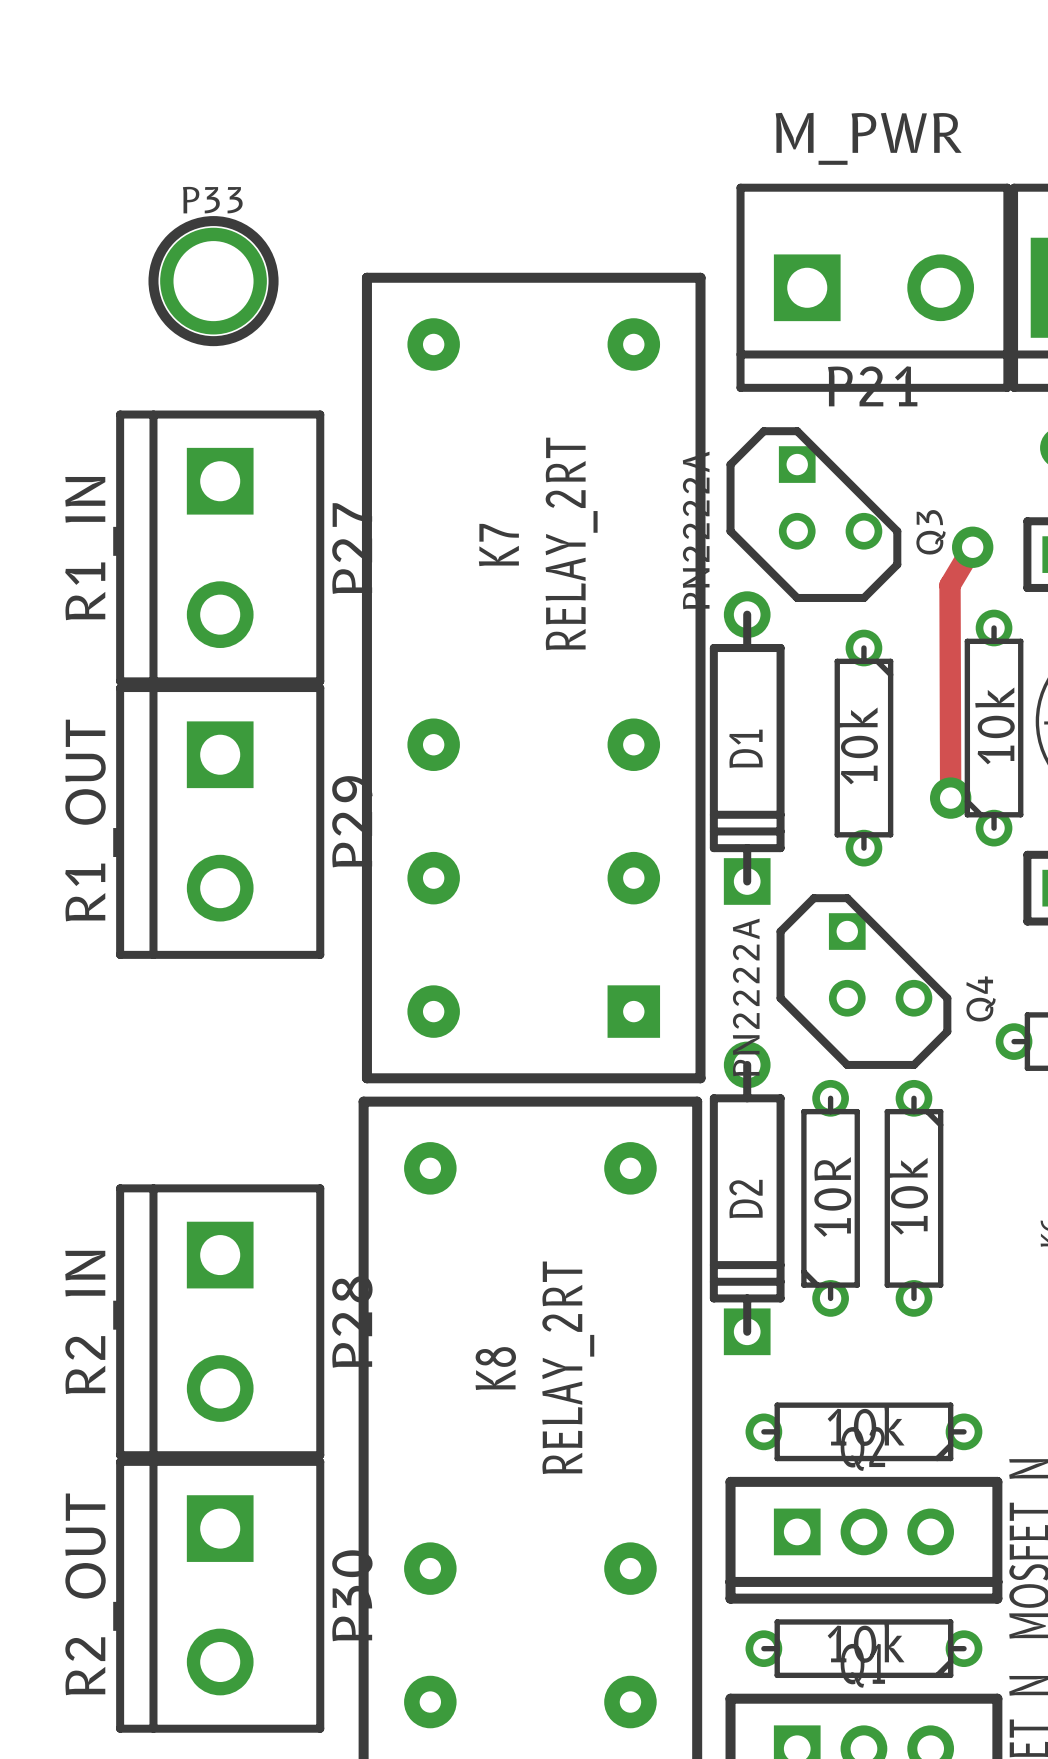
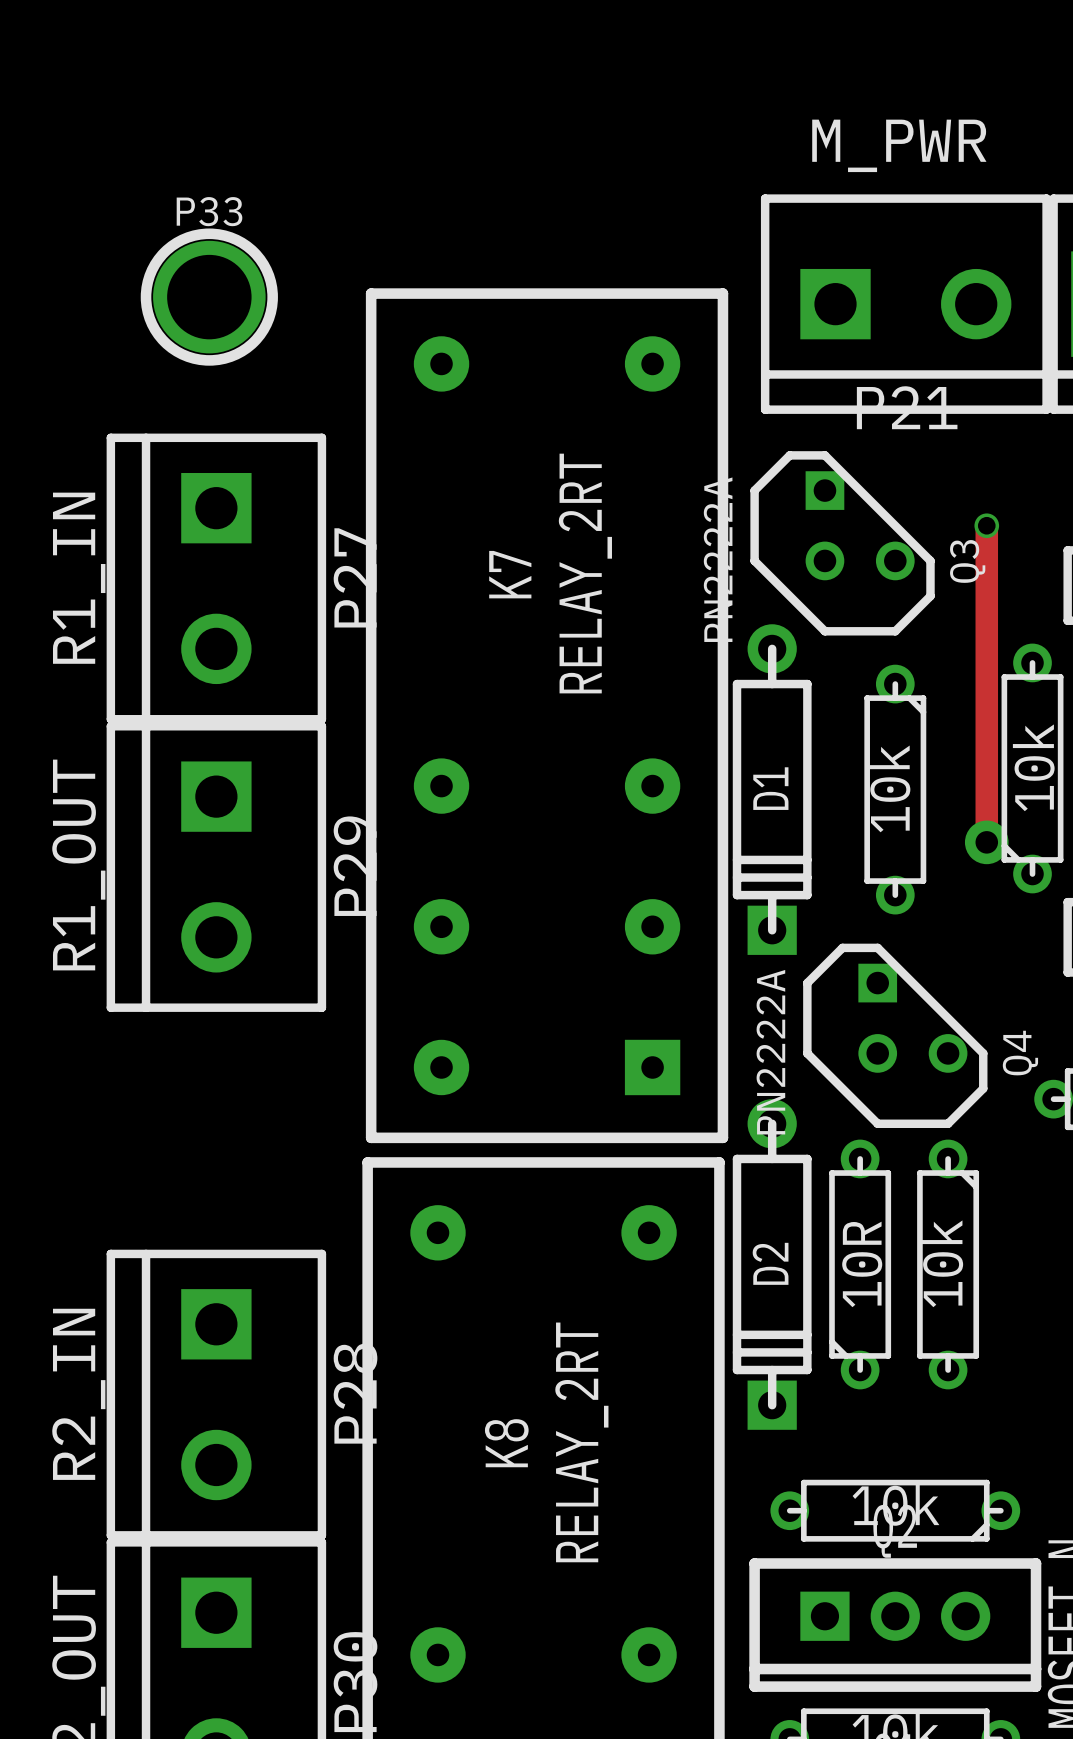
via: none -> (986, 525)
track: (972, 547) (950, 585) (950, 798) -> (986, 525) (986, 842)
via: (972, 547) -> none

